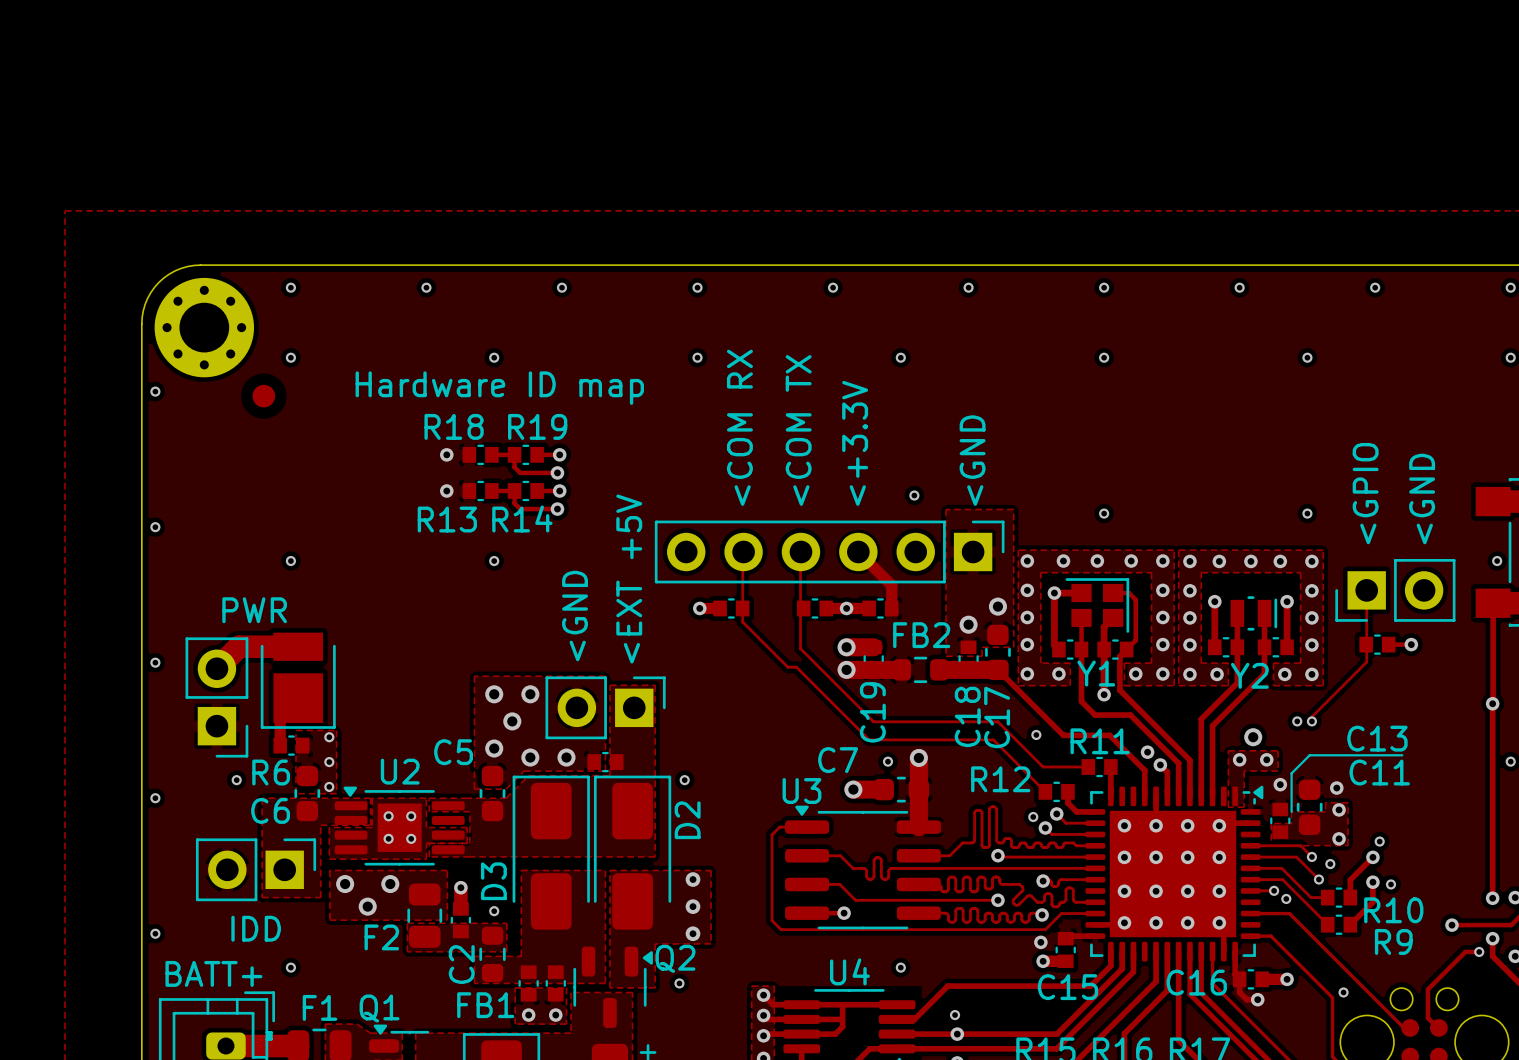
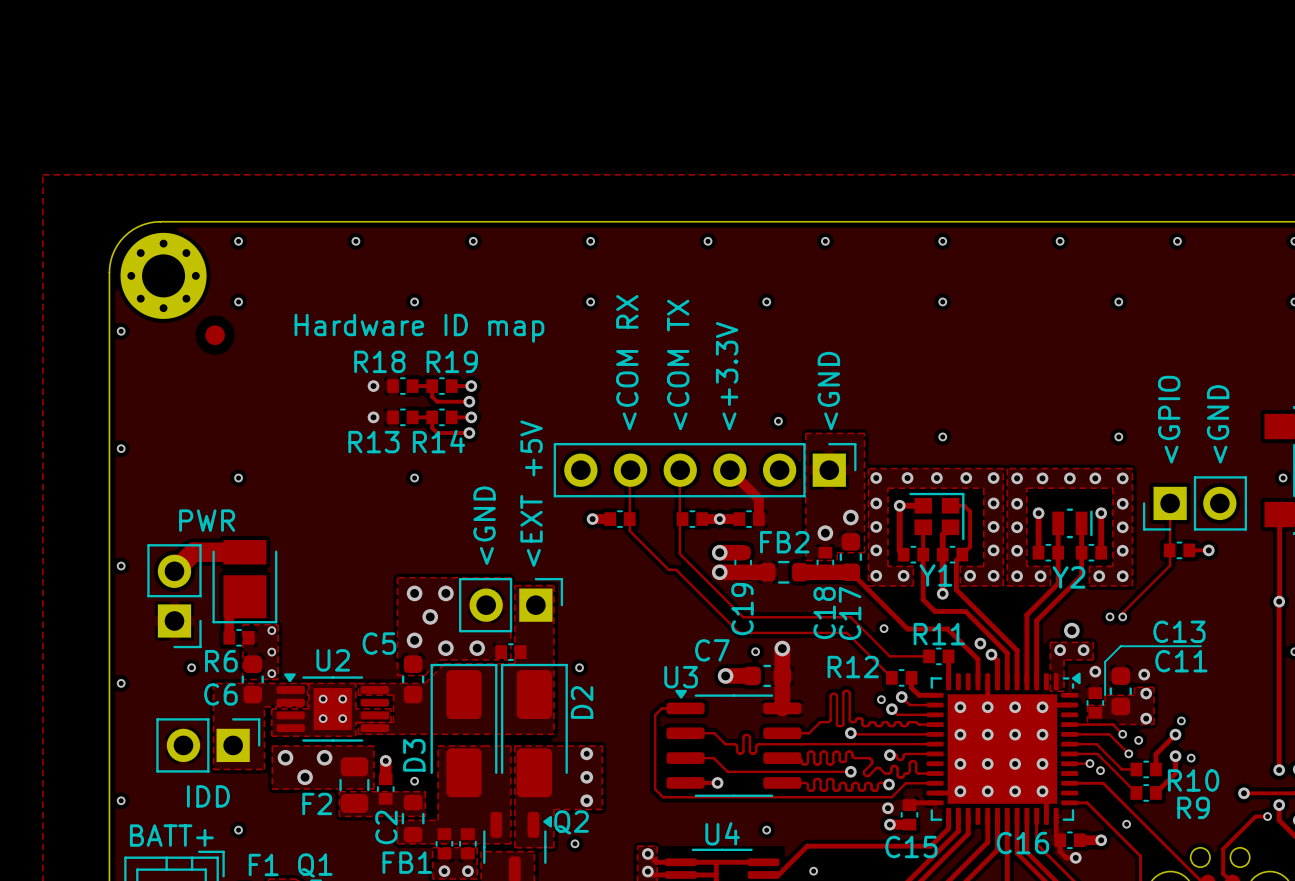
via position: (1343, 992) -> (1126, 824)

